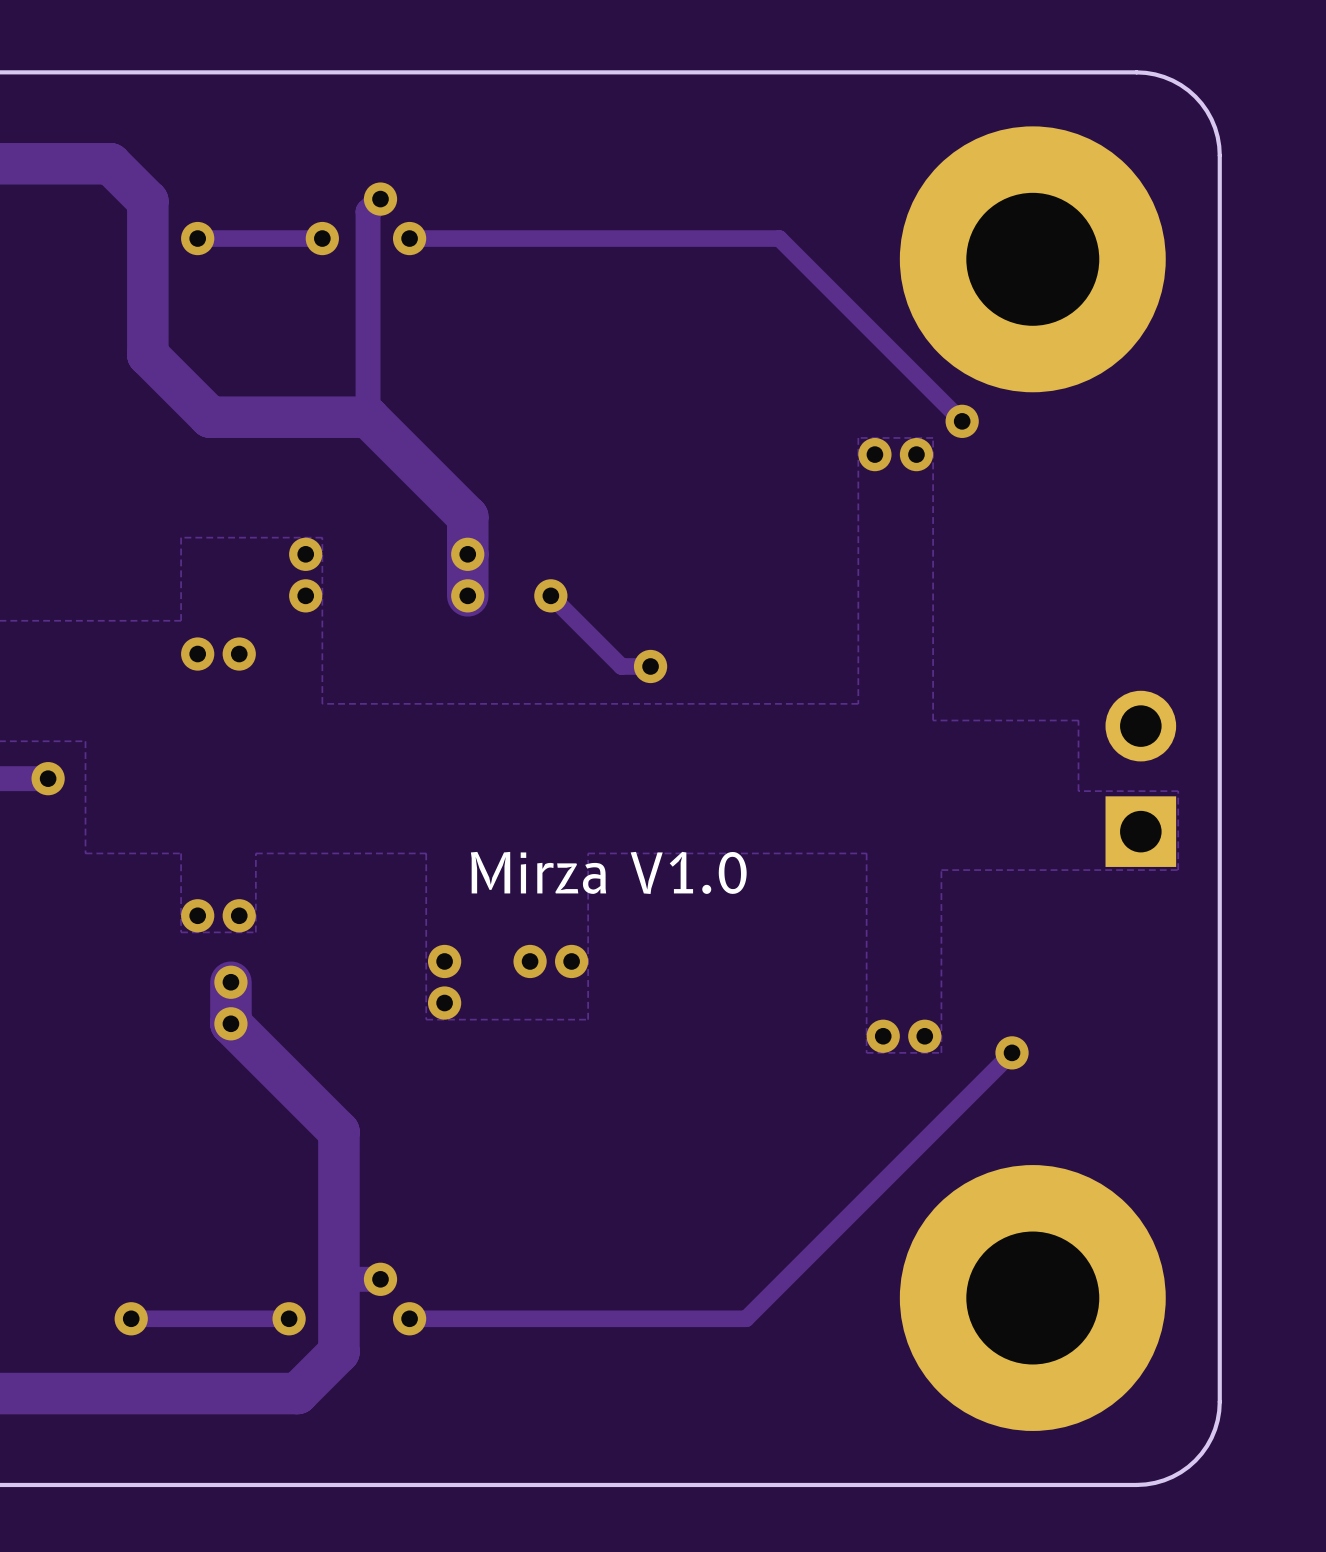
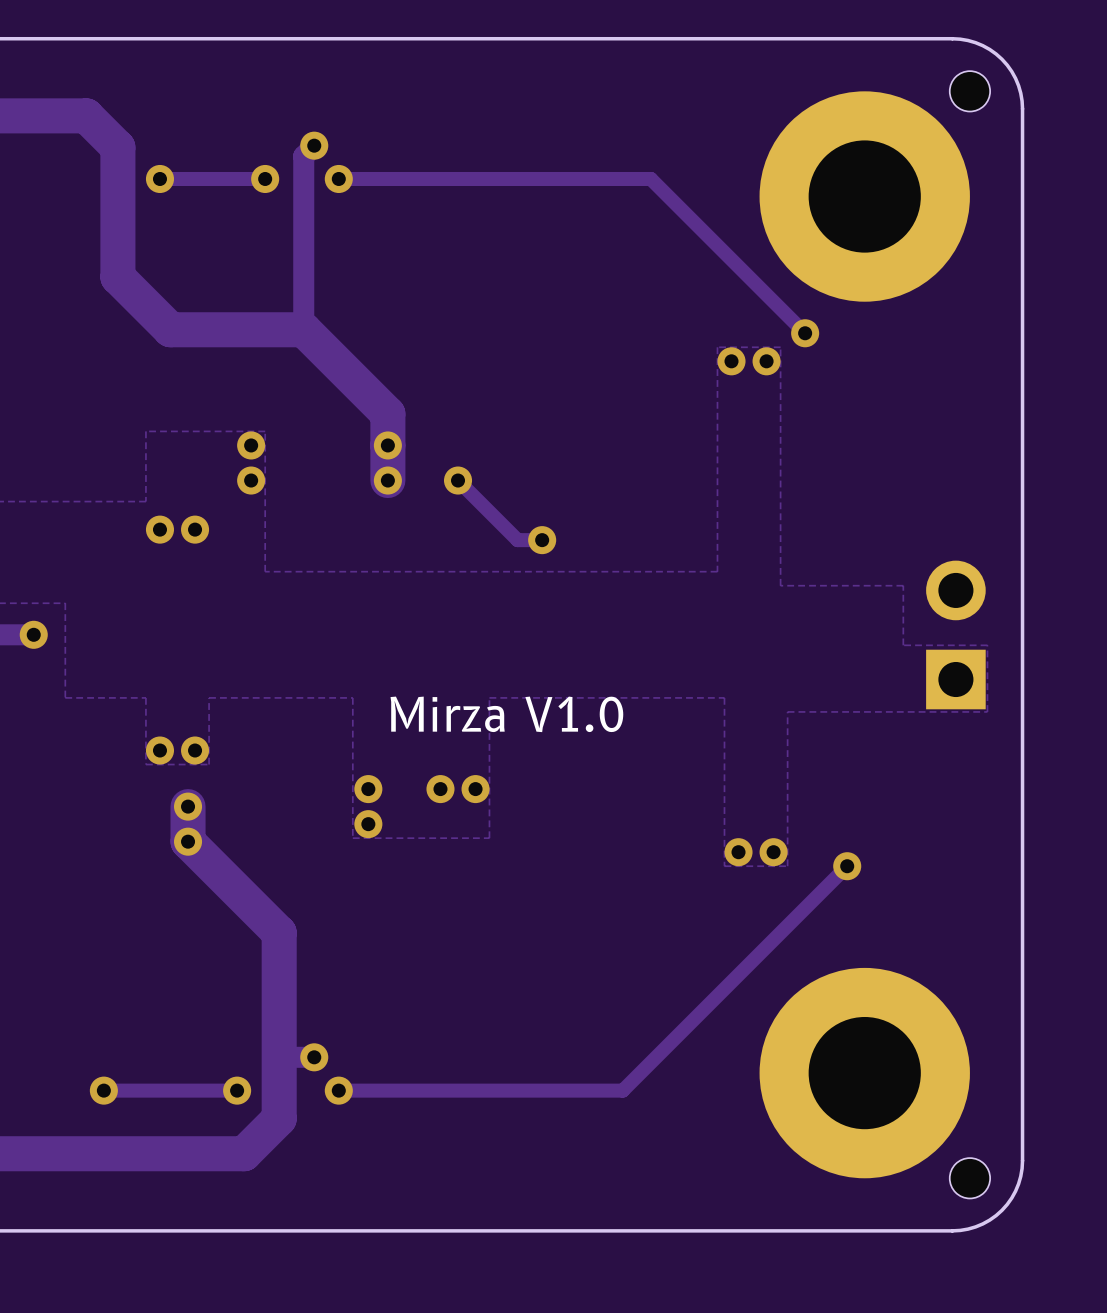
part footprint: [899, 126, 1166, 393] -> [759, 91, 970, 302]
part: none -> (969, 91)
part footprint: [899, 1165, 1166, 1431] -> [759, 967, 970, 1179]
part: none -> (969, 1178)

